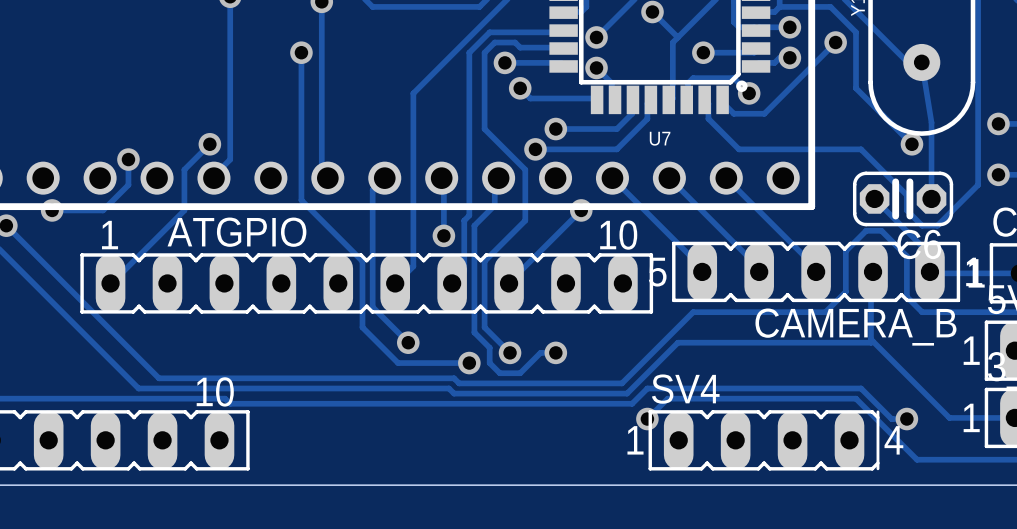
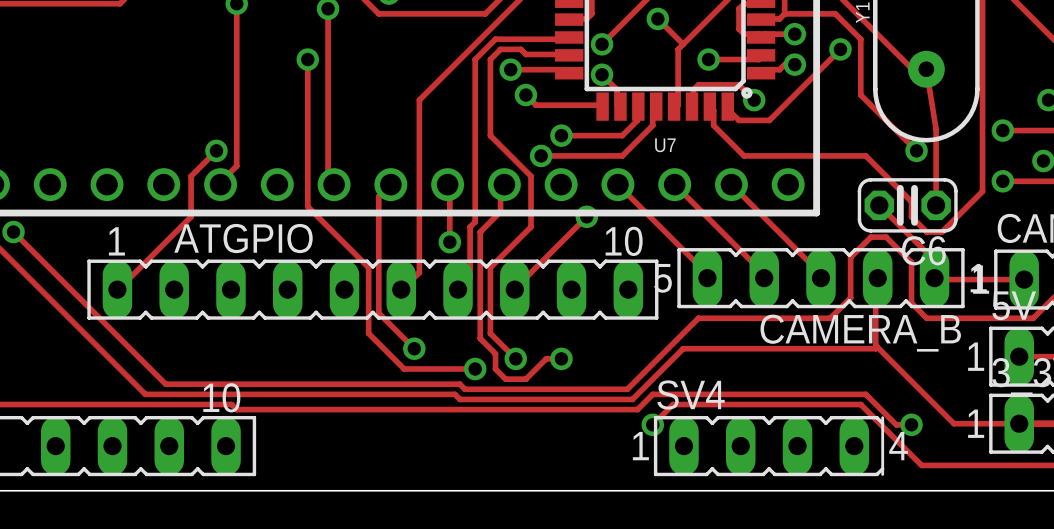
track: (128, 159) (128, 184) (103, 210) (52, 210) -> none
via: (128, 159) -> none
via: (52, 210) -> none

